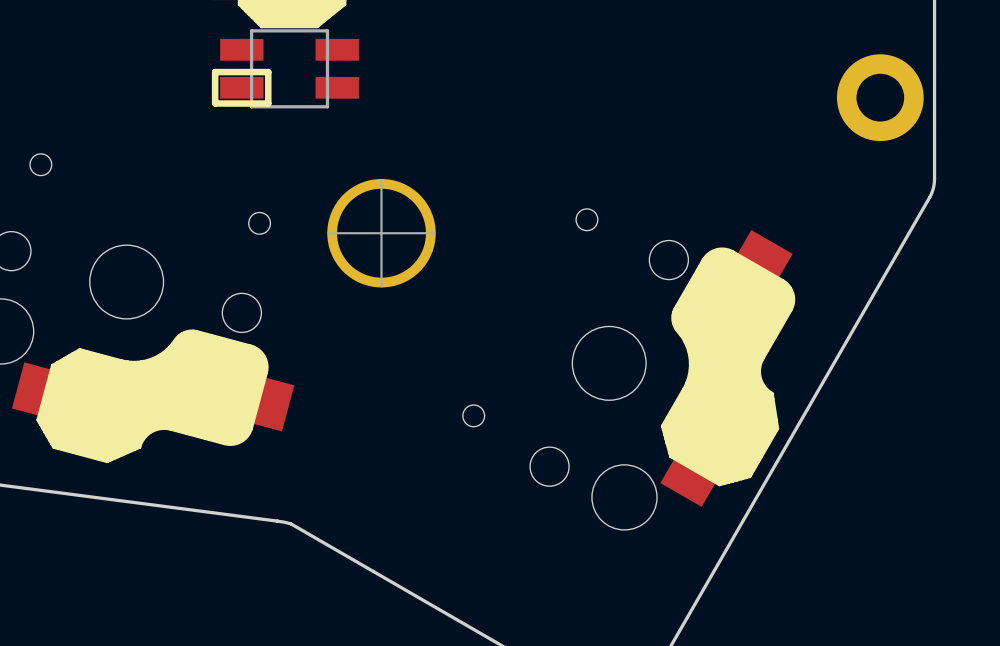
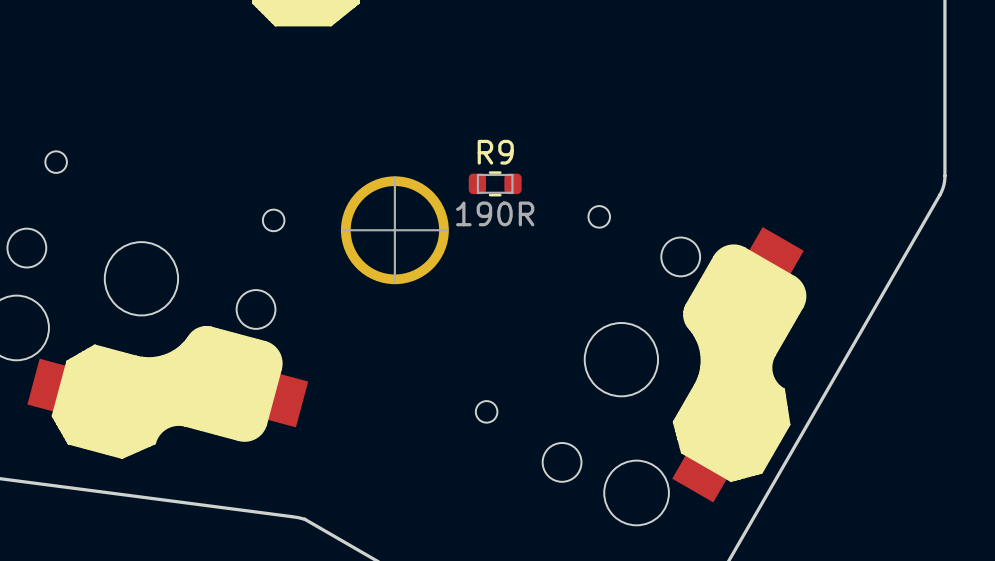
part: (285, 68) -> none
part: (880, 97) -> none
R9: none -> 190R (495, 183)

